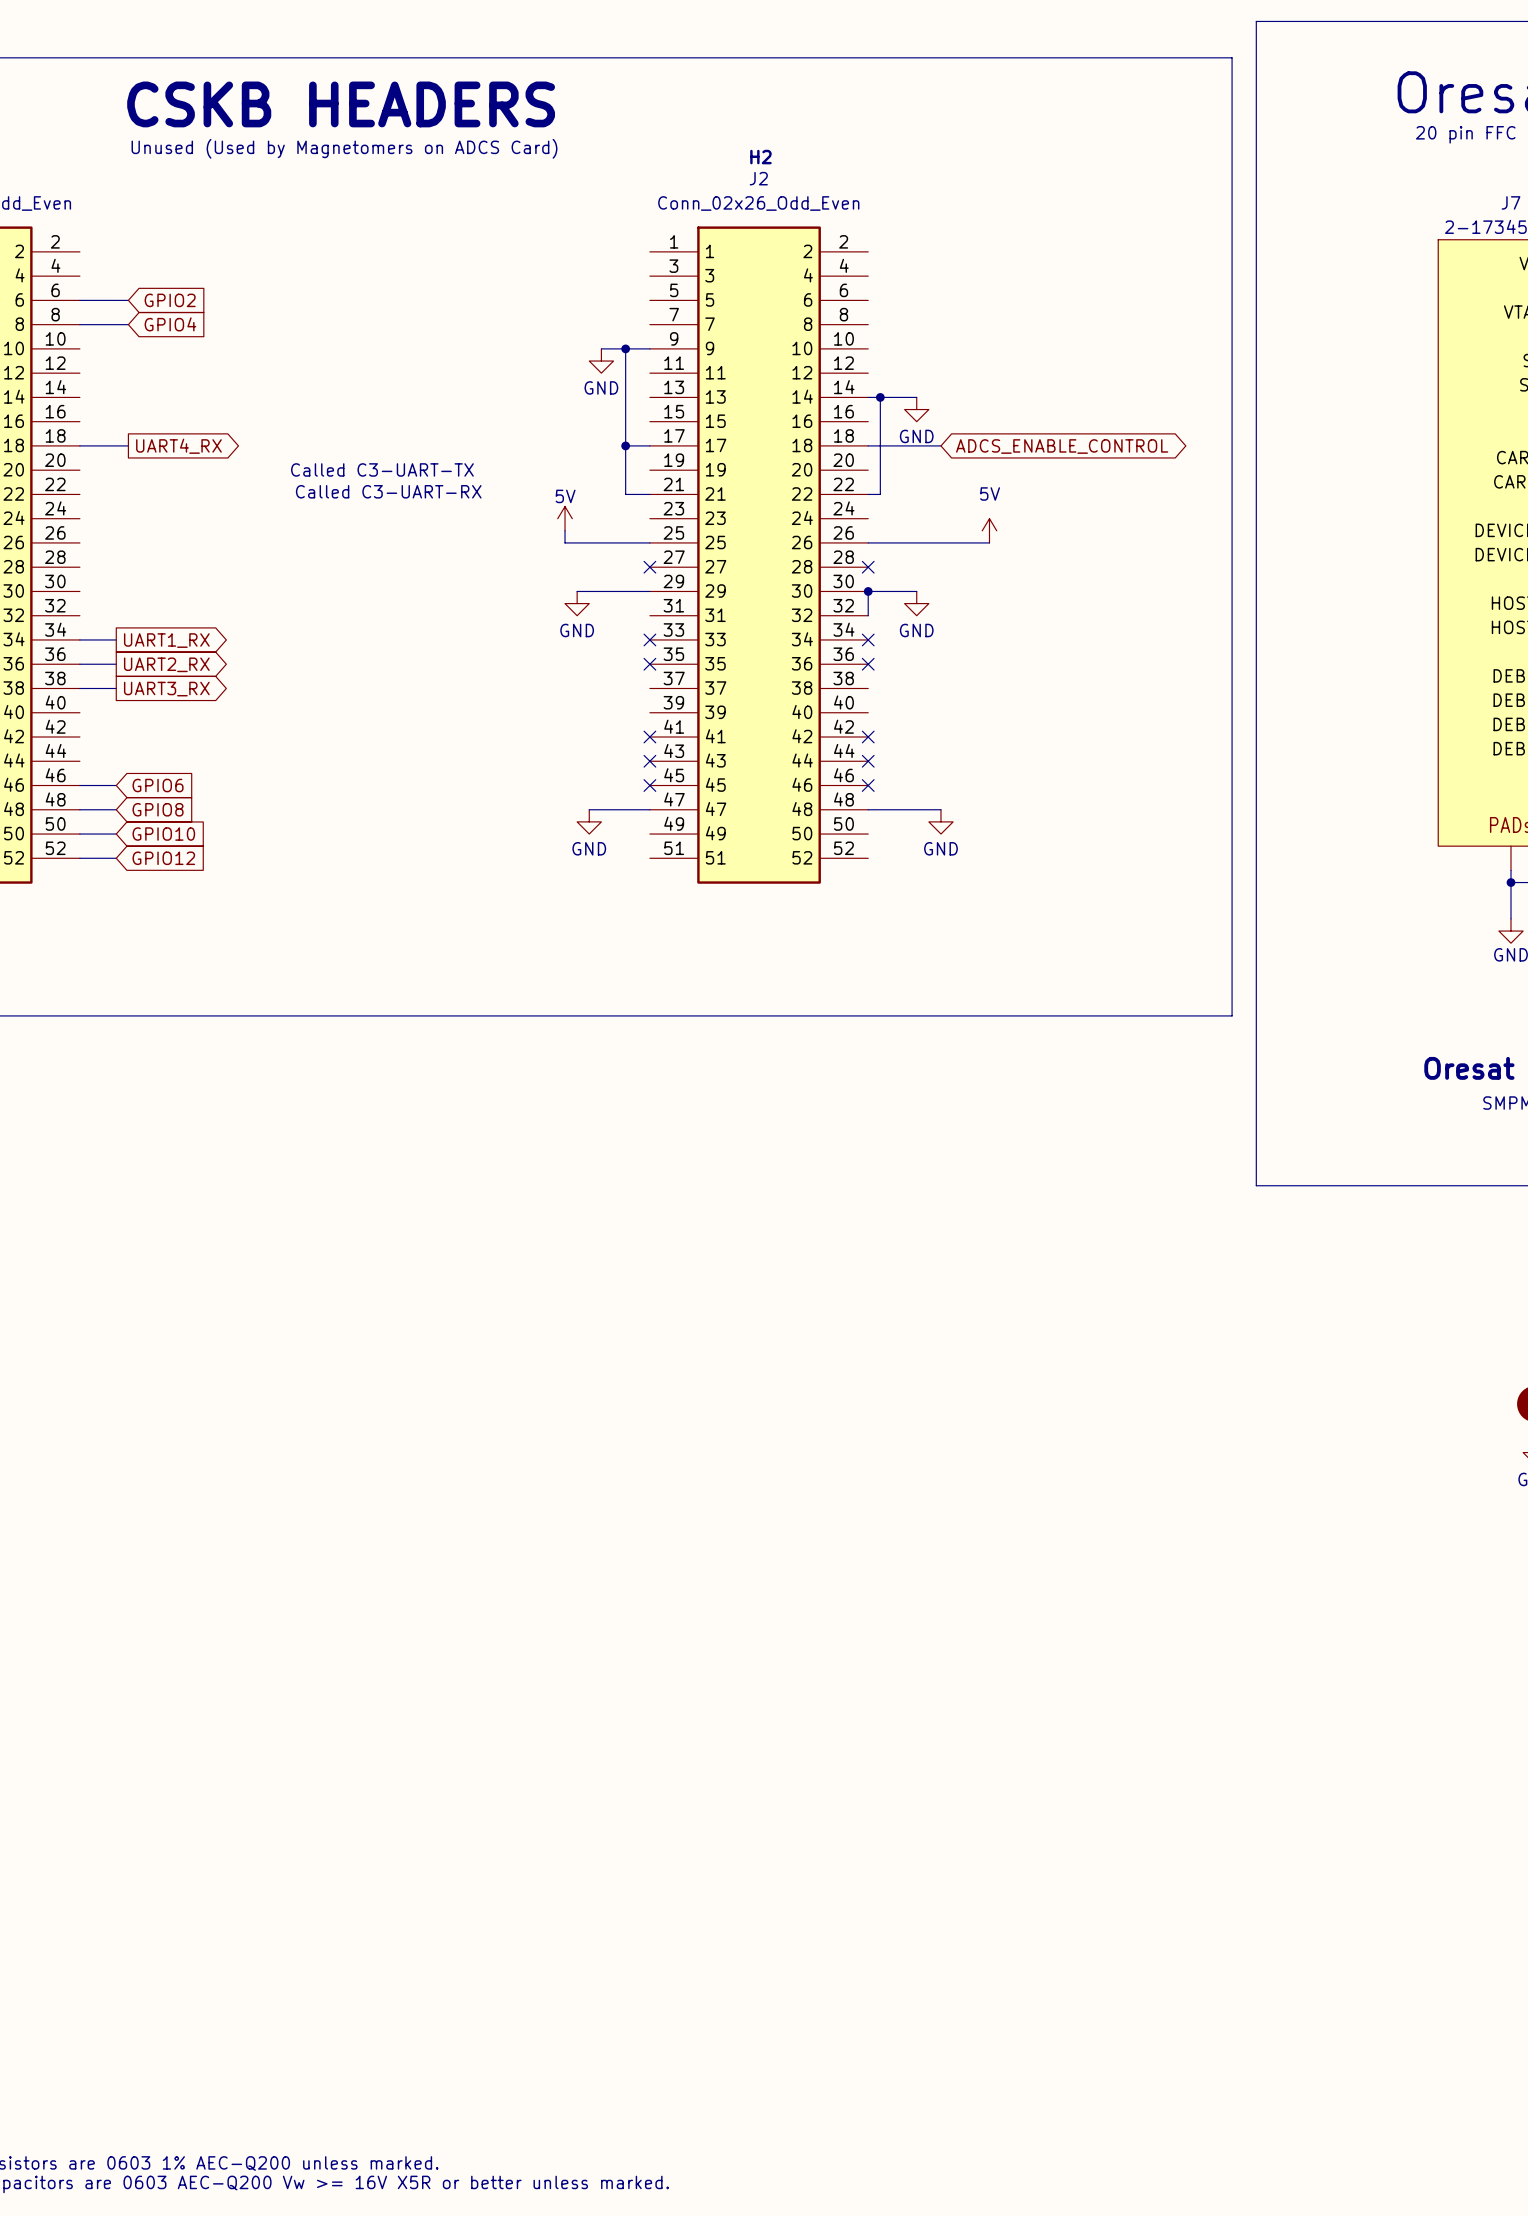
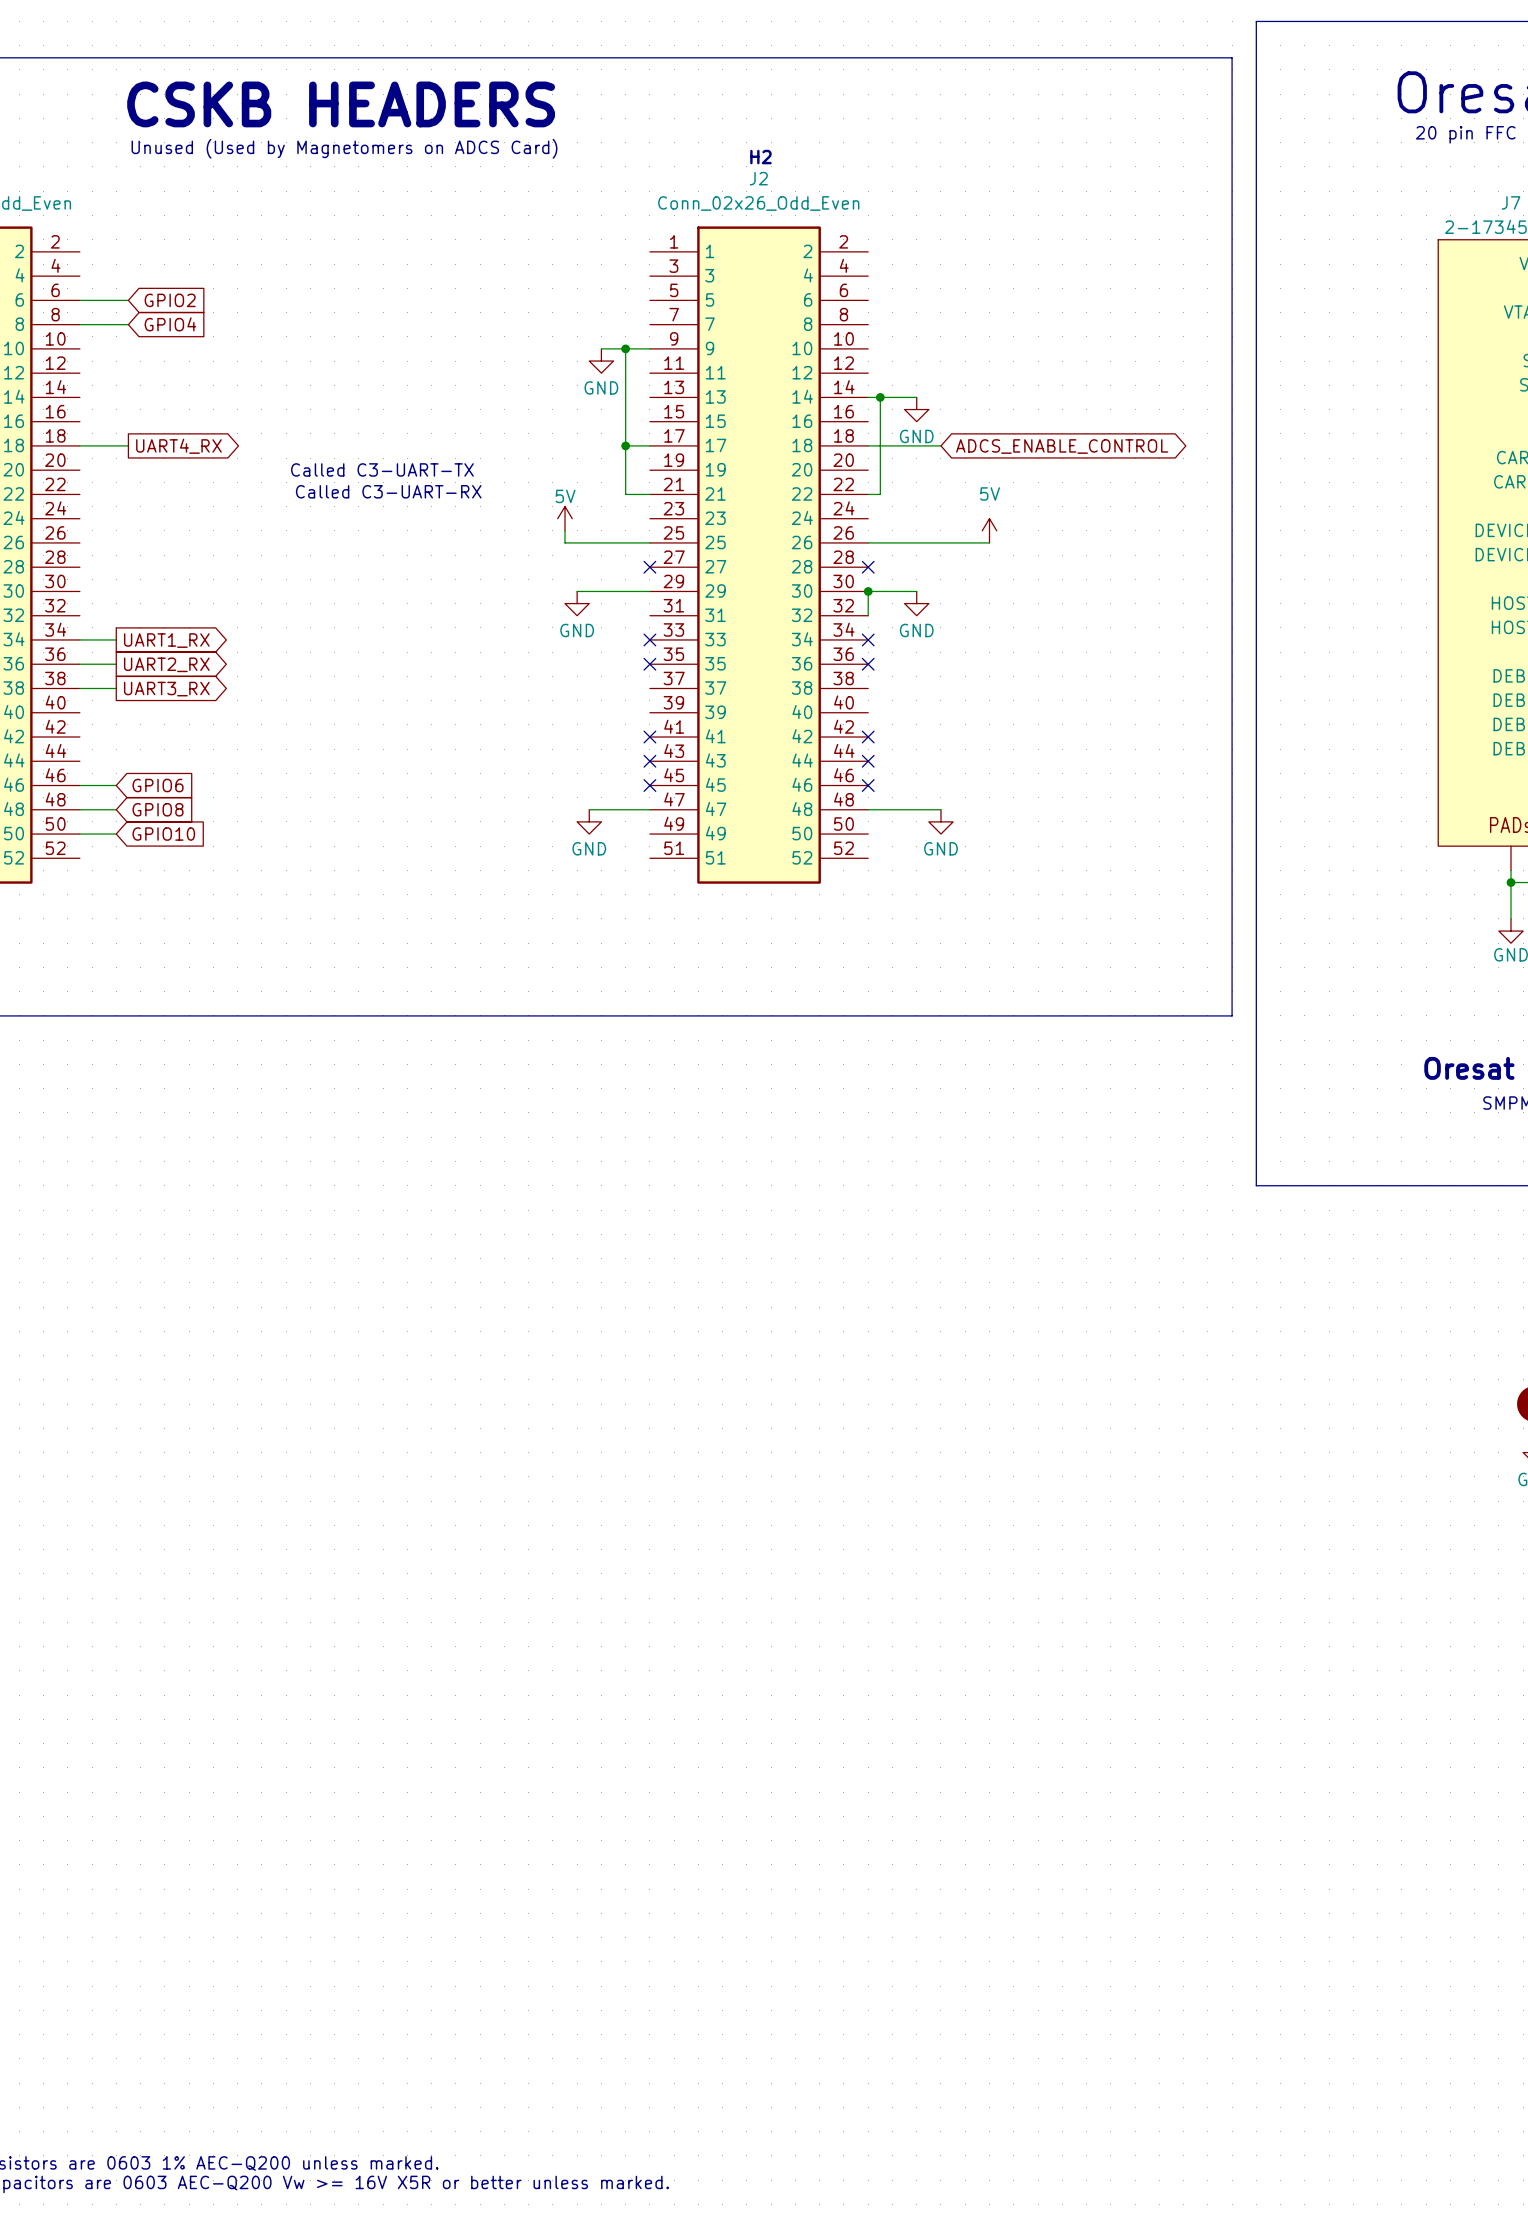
wire: (79, 858) (116, 858) -> none
global label: GPIO12 (163, 858) -> none

